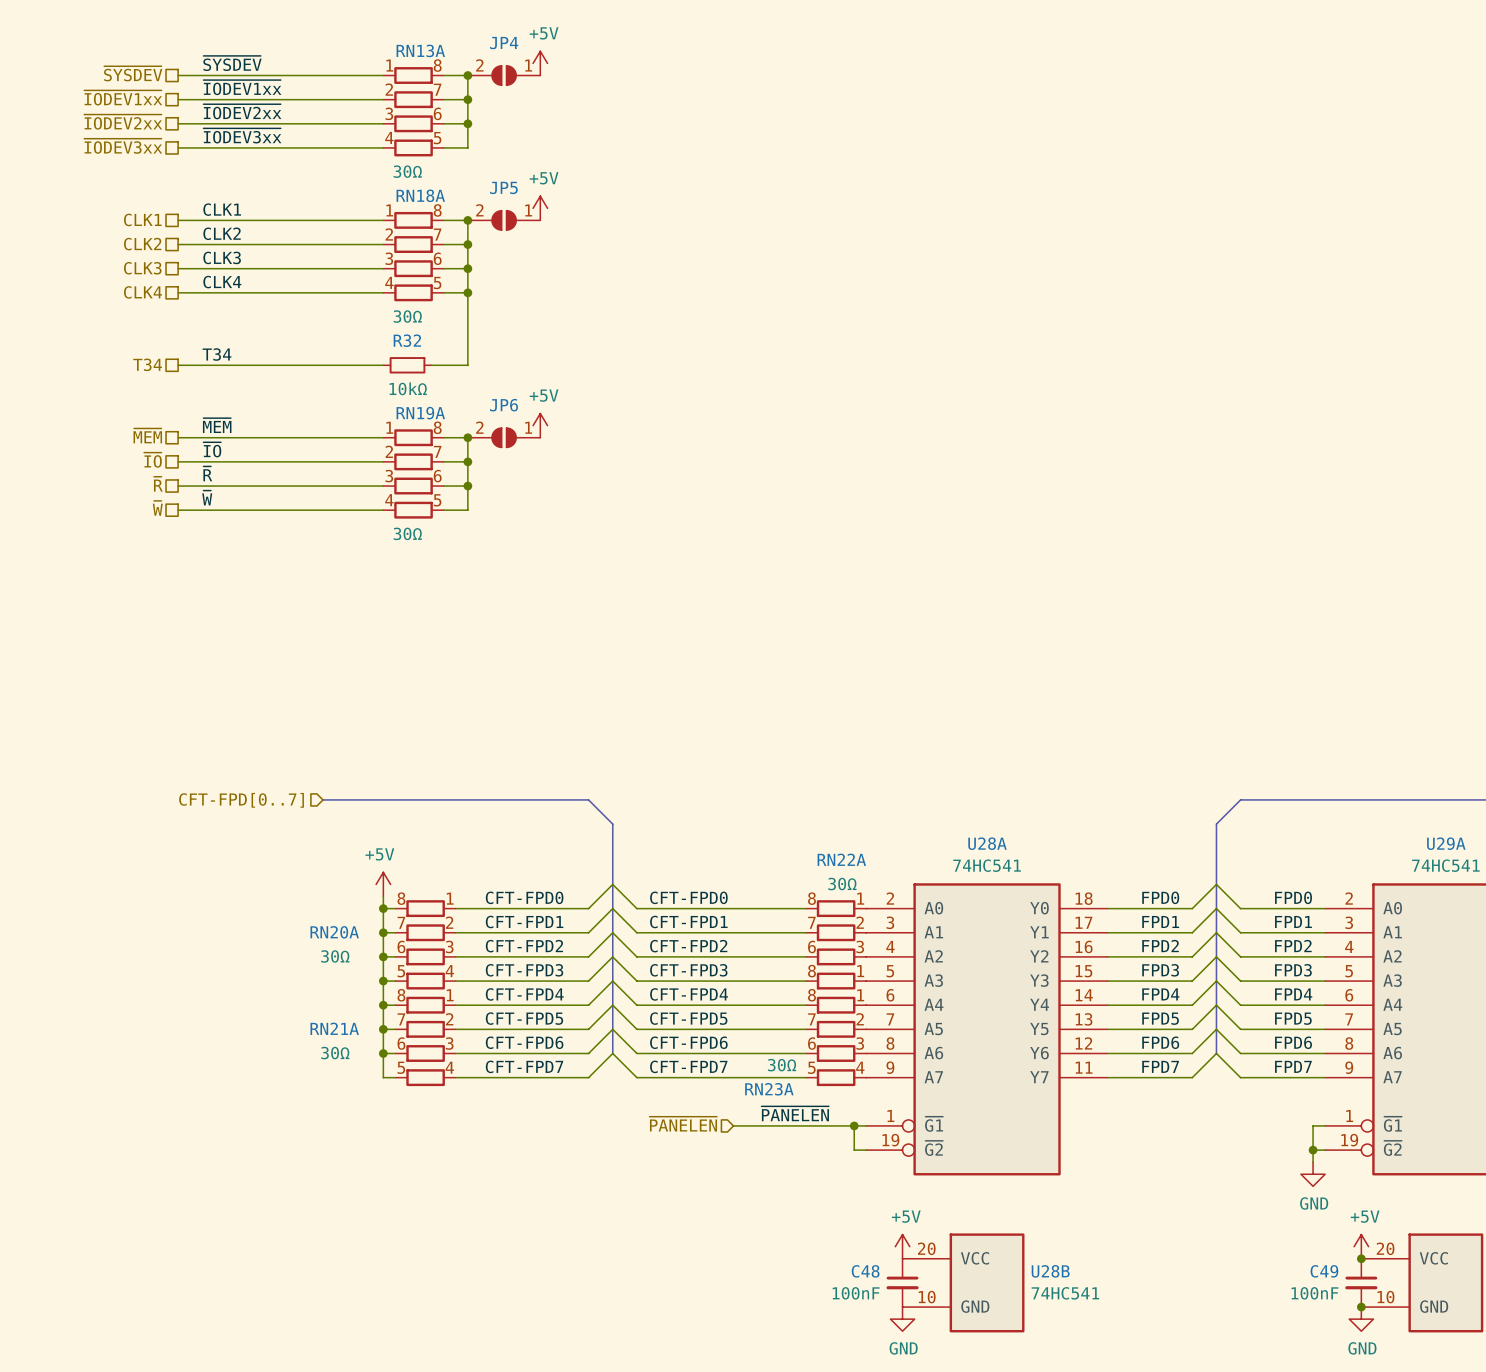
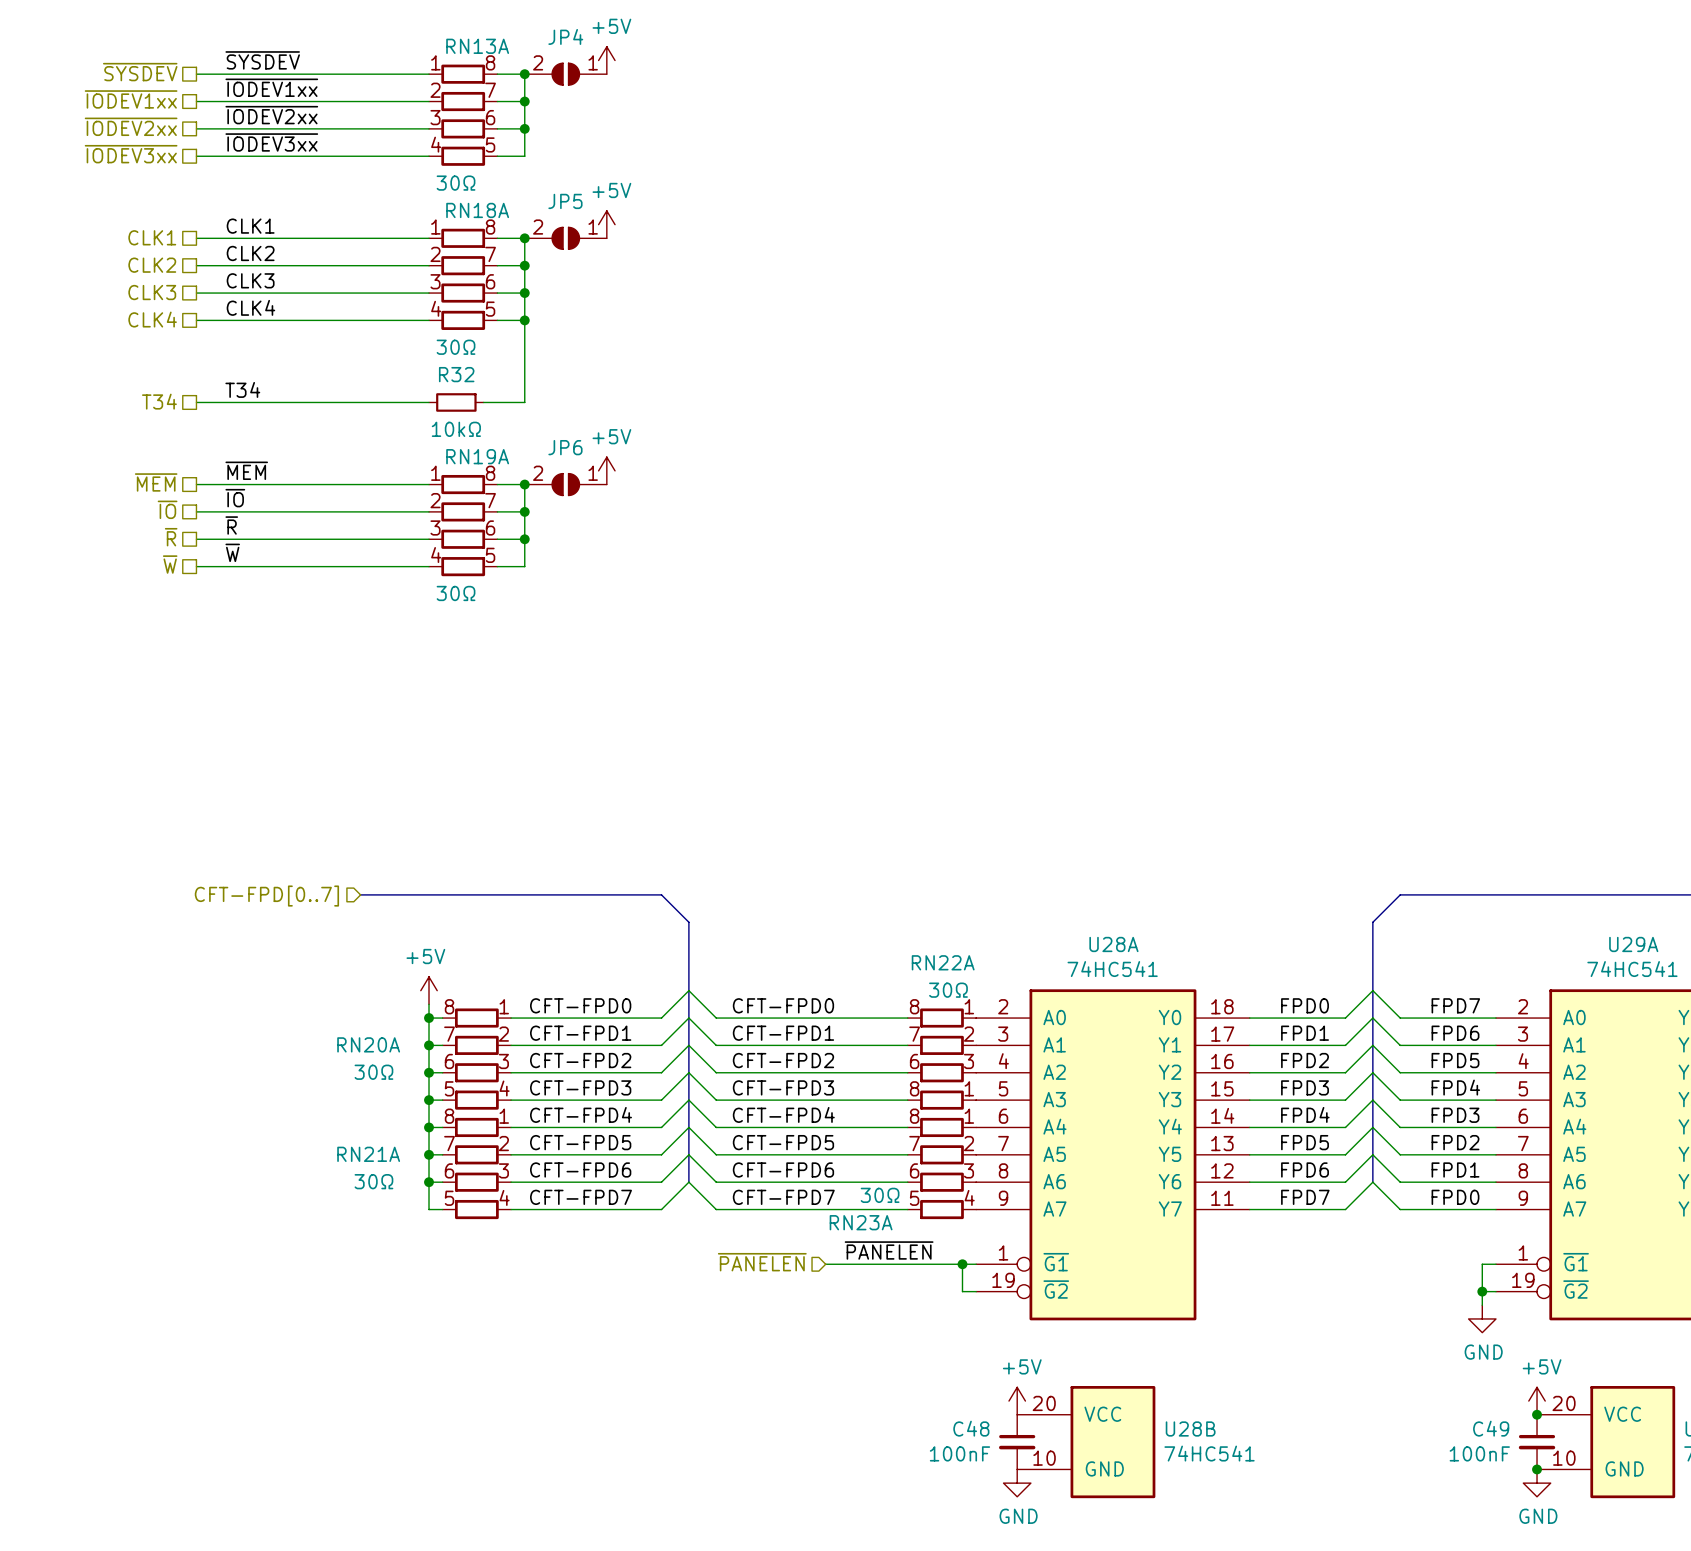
label: FPD0 (1293, 897) -> FPD7 (1455, 1005)
label: FPD1 (1293, 921) -> FPD6 (1455, 1033)
label: FPD2 (1293, 946) -> FPD5 (1455, 1060)
label: FPD3 (1293, 970) -> FPD4 (1455, 1087)
label: FPD4 (1293, 994) -> FPD3 (1455, 1115)
label: FPD5 (1293, 1018) -> FPD2 (1455, 1142)
label: FPD6 (1293, 1042) -> FPD1 (1455, 1169)
label: FPD7 (1293, 1066) -> FPD0 (1455, 1197)

